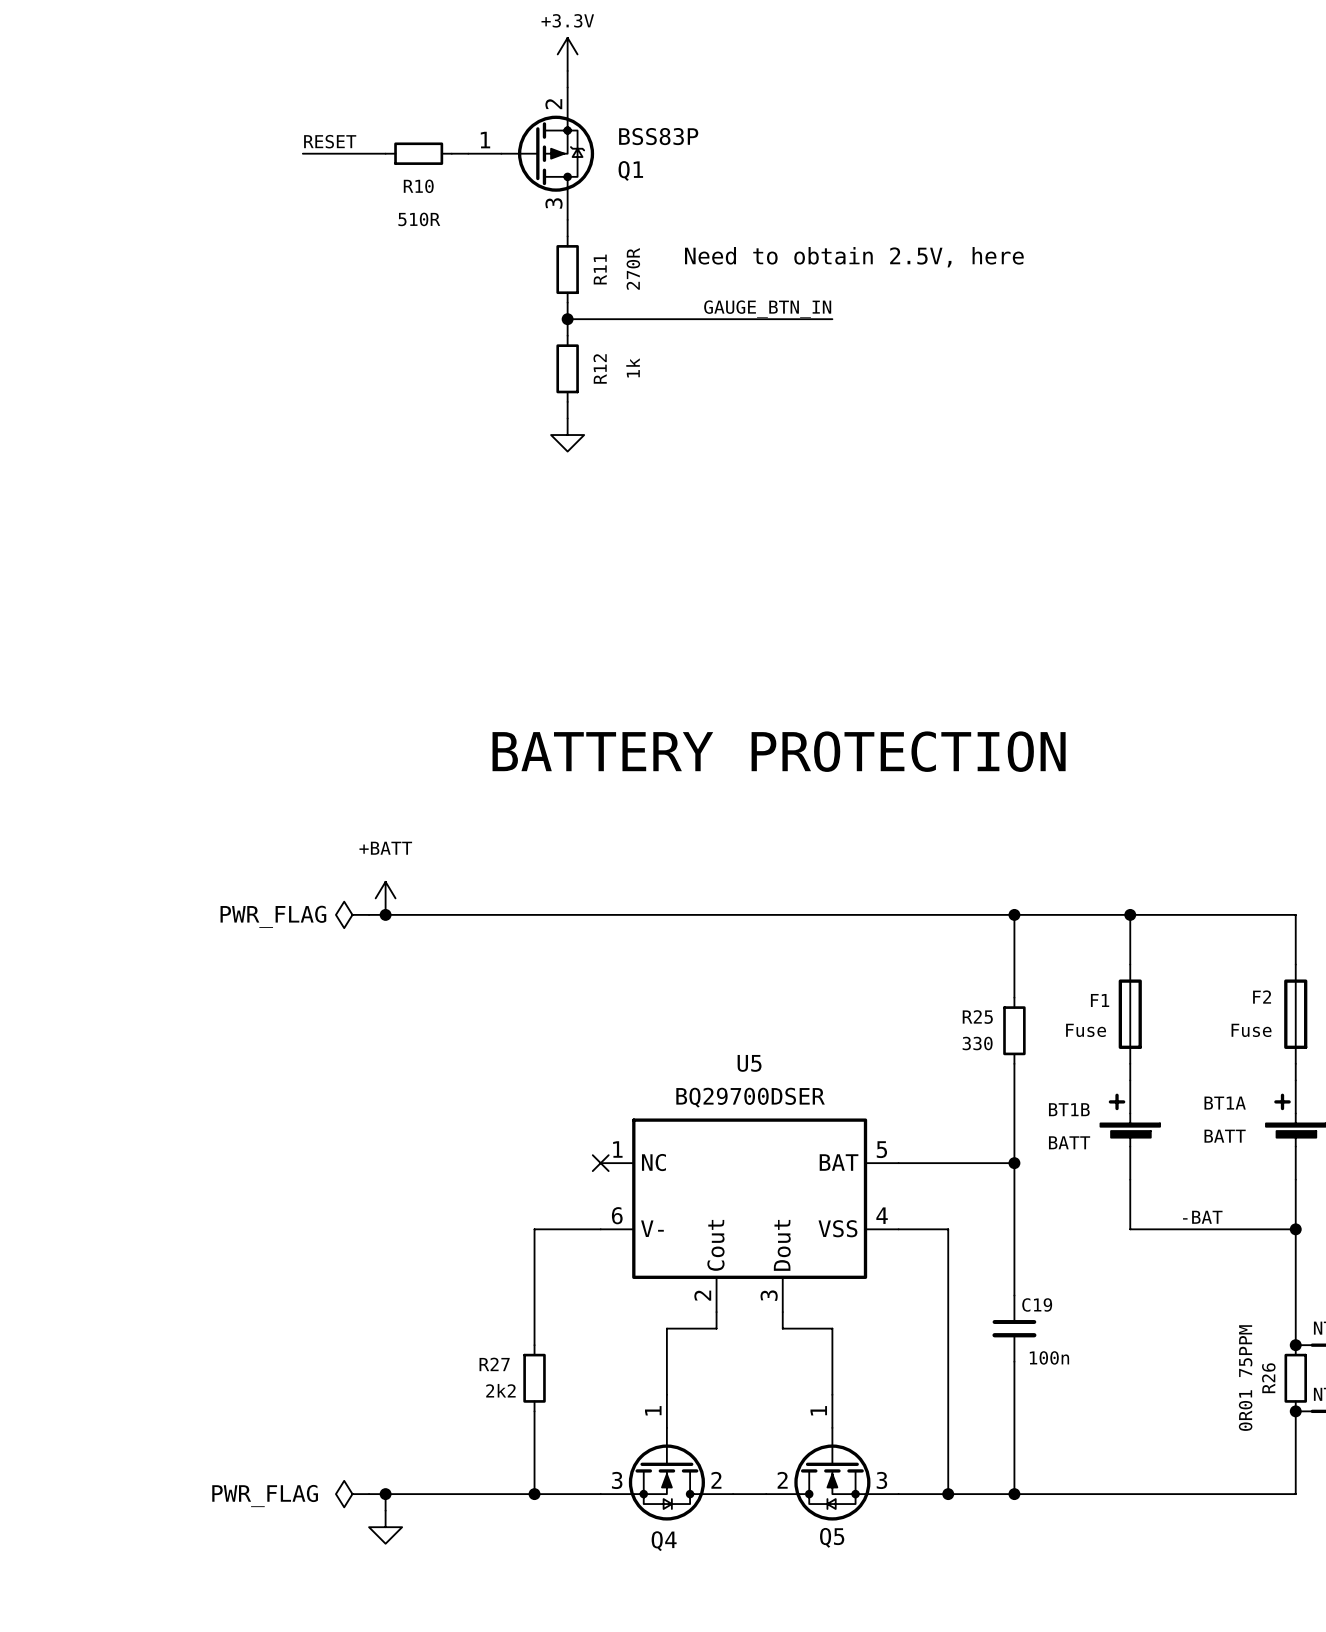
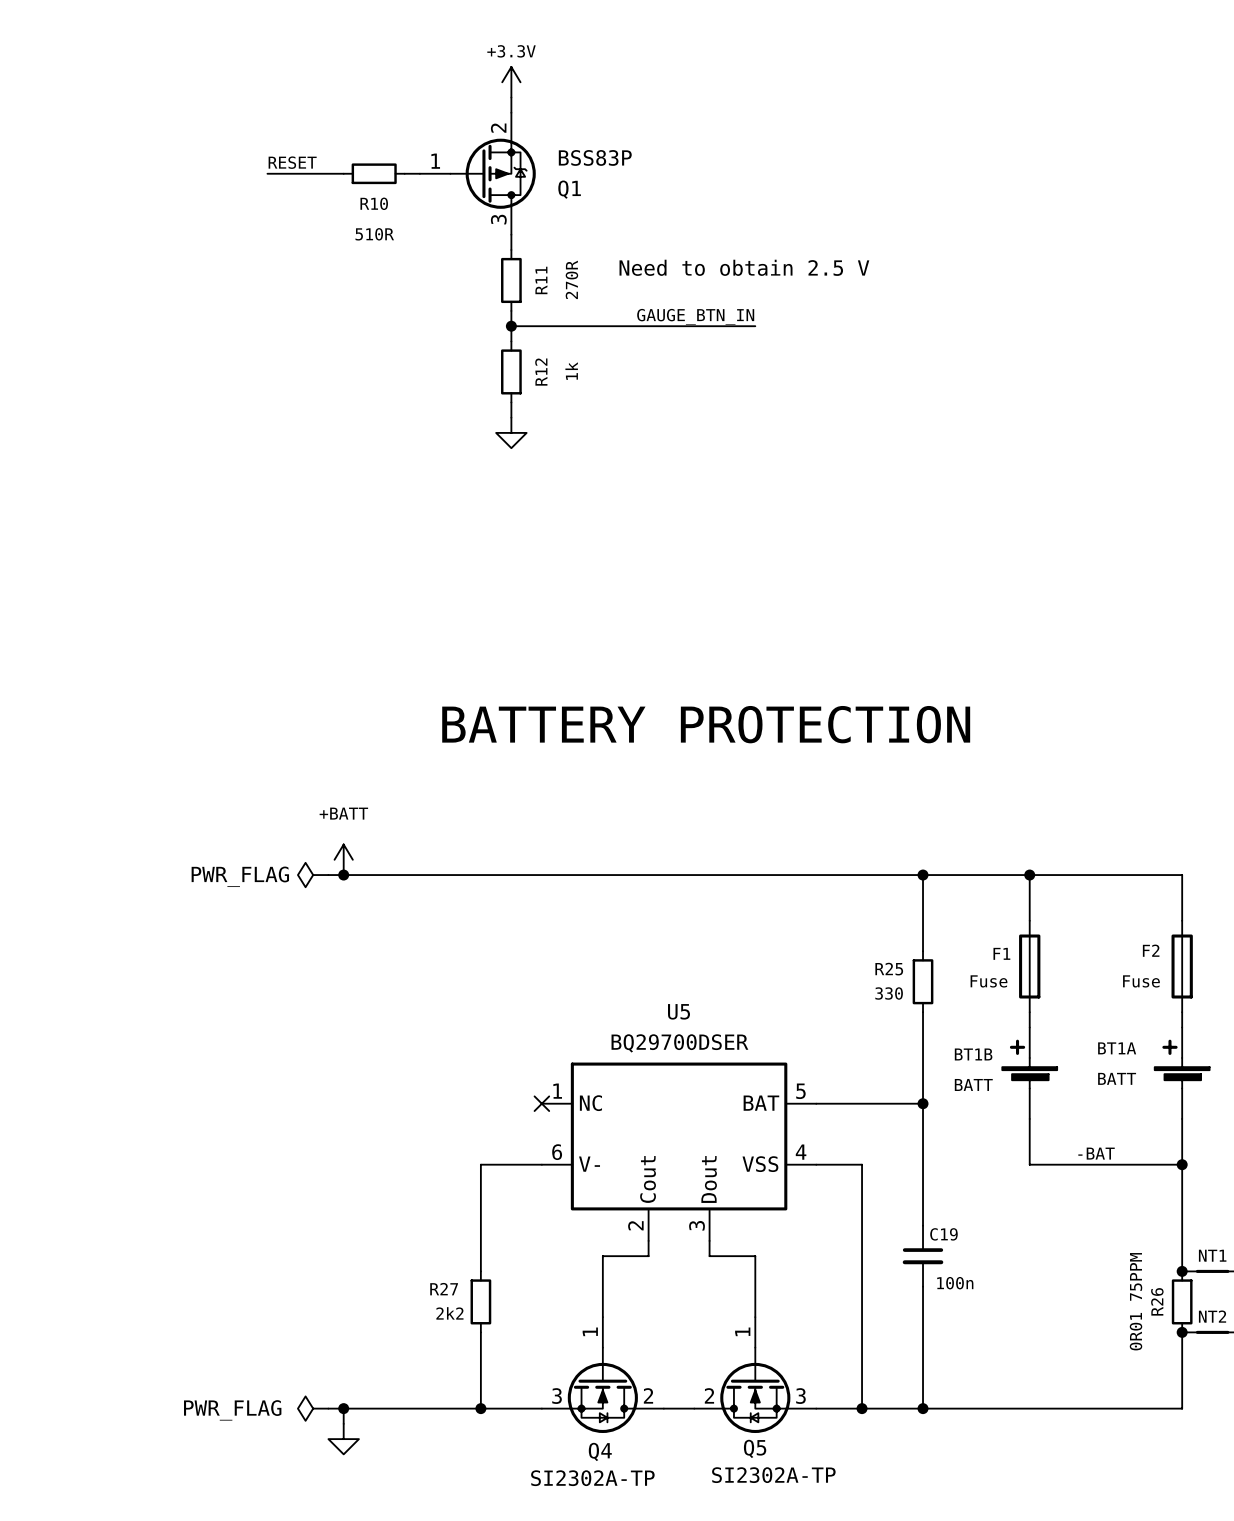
text: Need to obtain 2.5V, here (854, 257) -> Need to obtain 2.5 V (744, 267)
Q5 value: none -> SI2302A-TP (773, 1475)
Q4 value: none -> SI2302A-TP (592, 1478)

